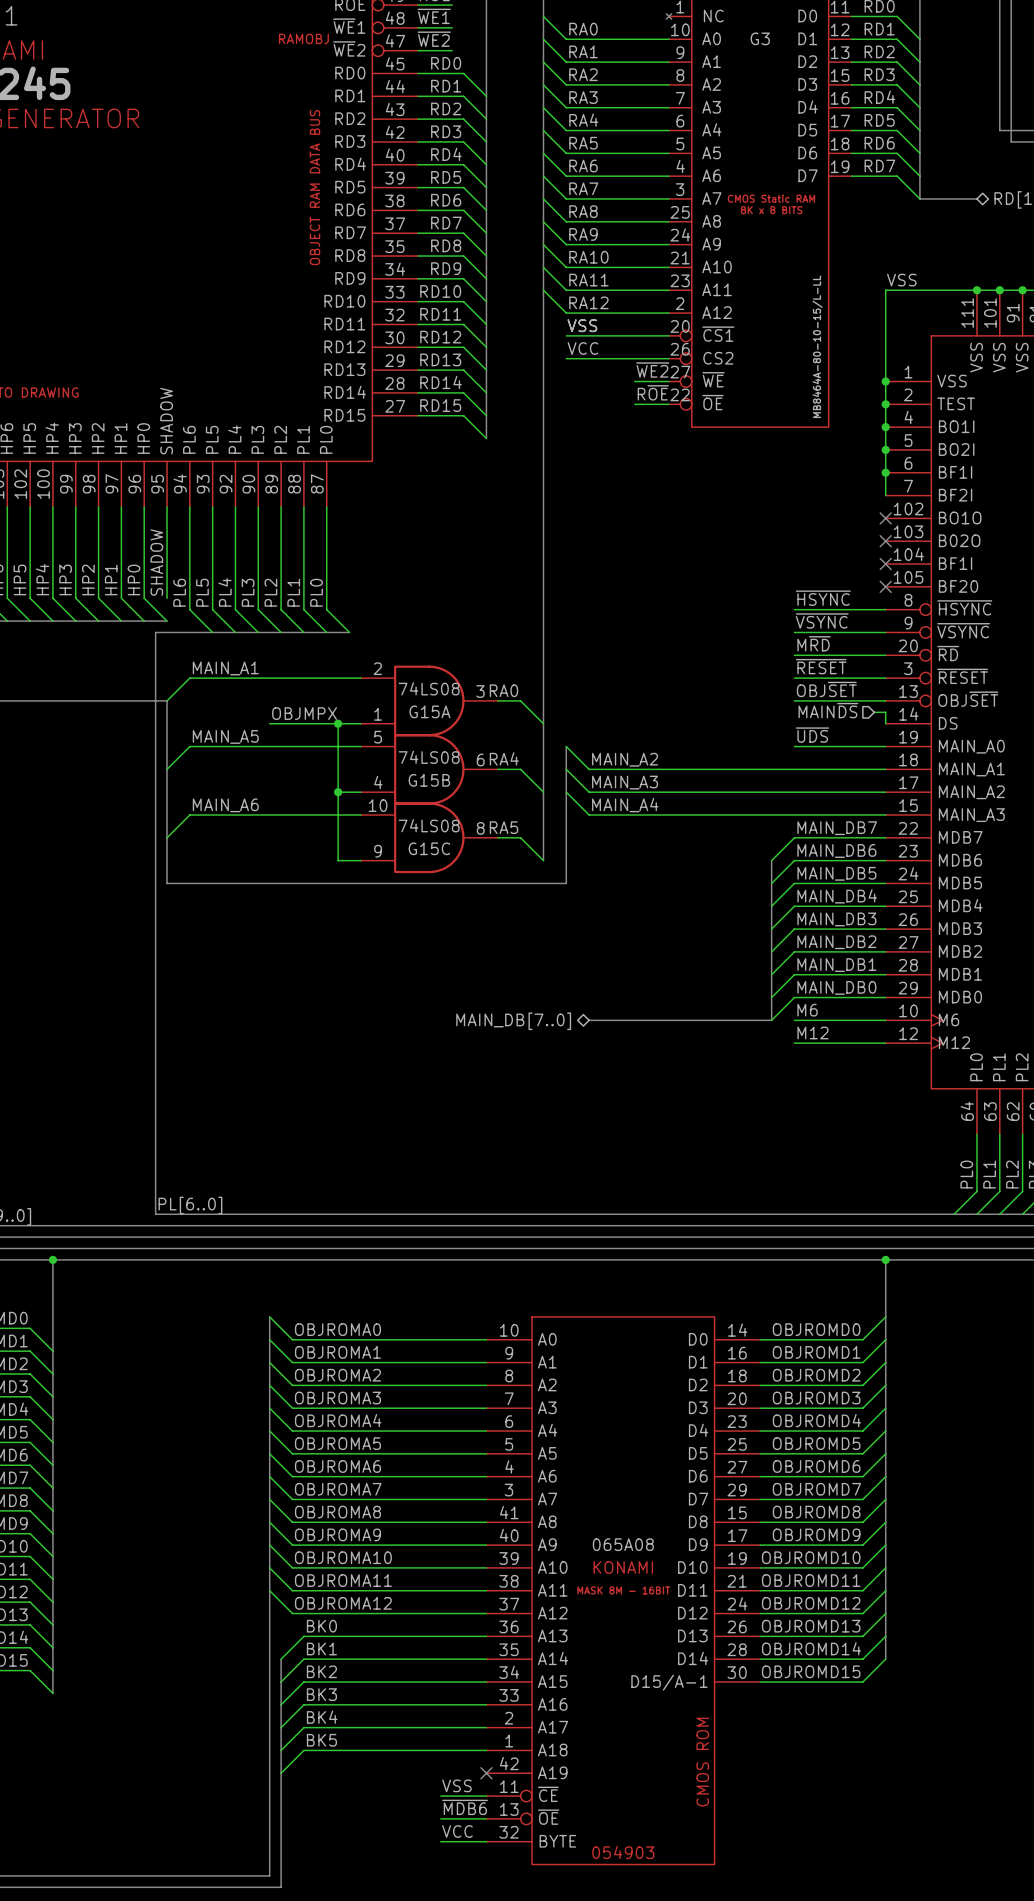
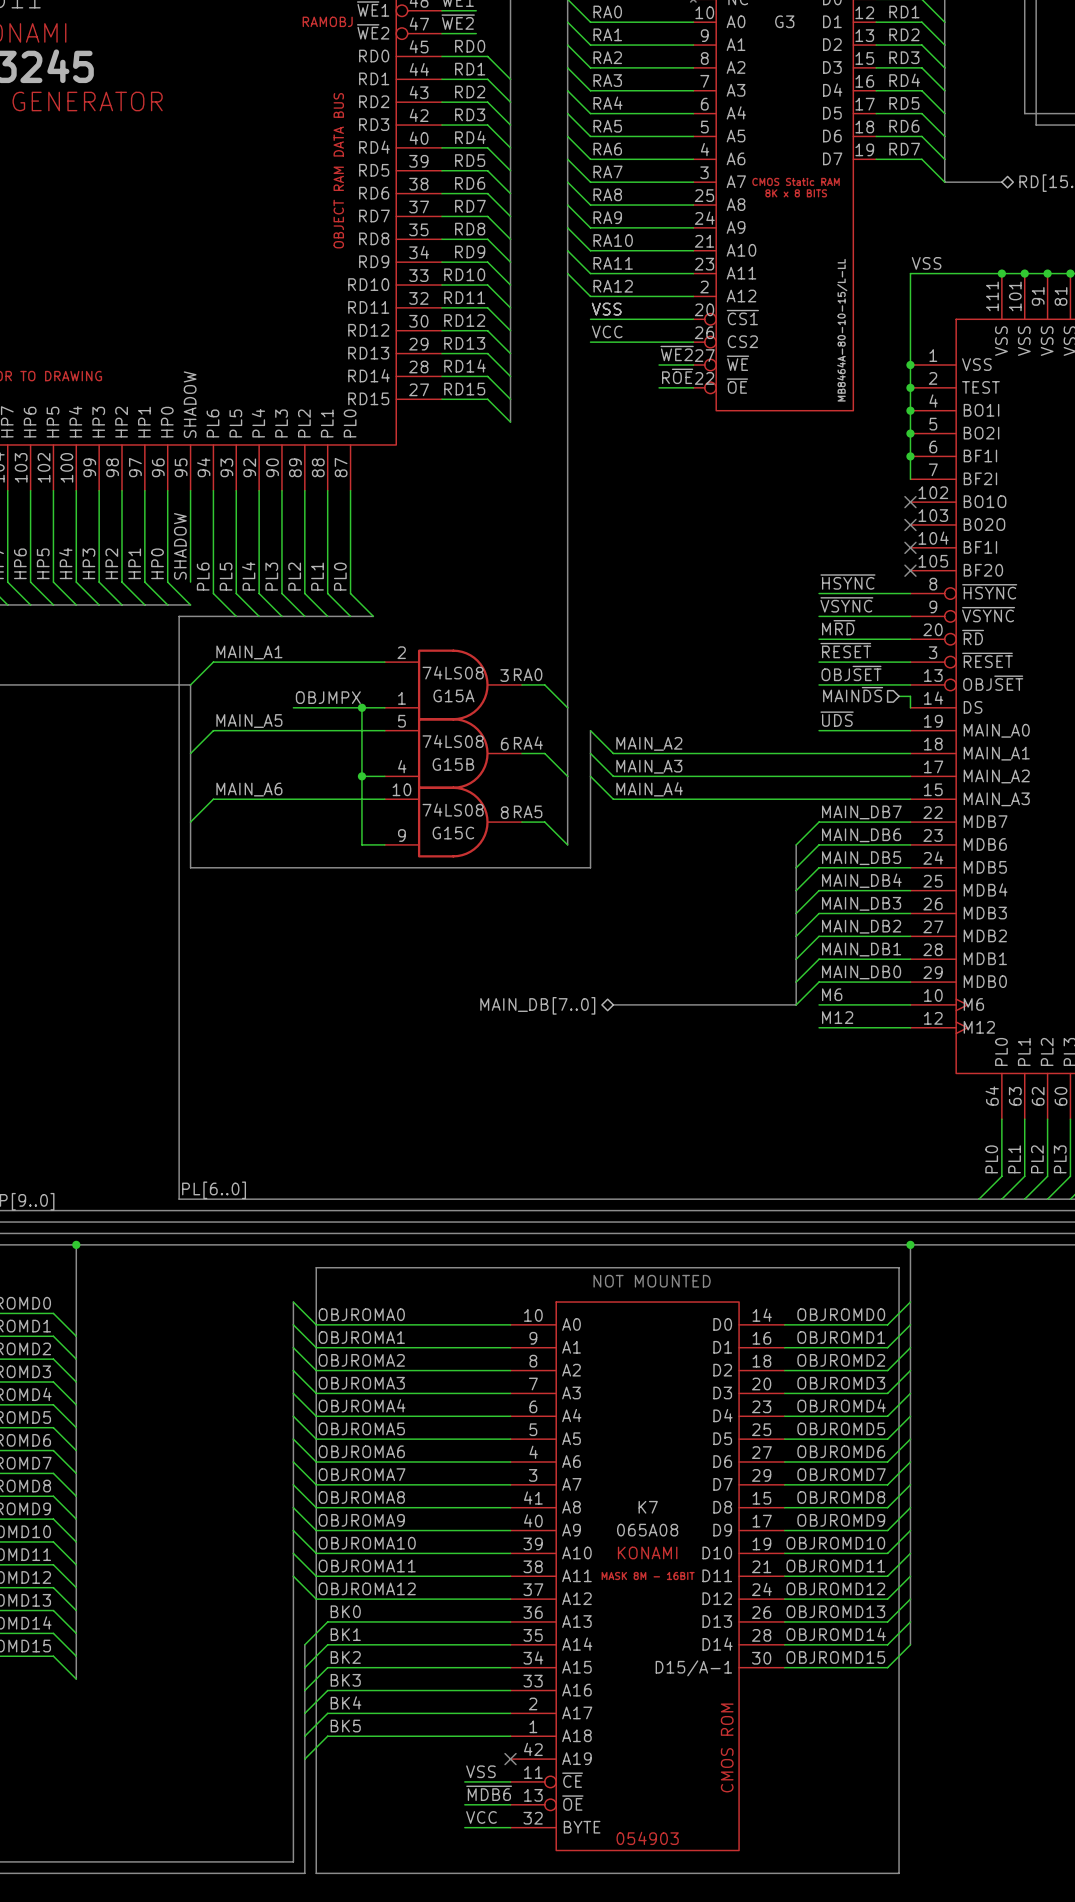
line: none -> (316, 1267) (899, 1267) (899, 1873) (316, 1873) (316, 1267)
text: none -> NOT MOUNTED (652, 1281)
K7 name: none -> K7 (648, 1507)

